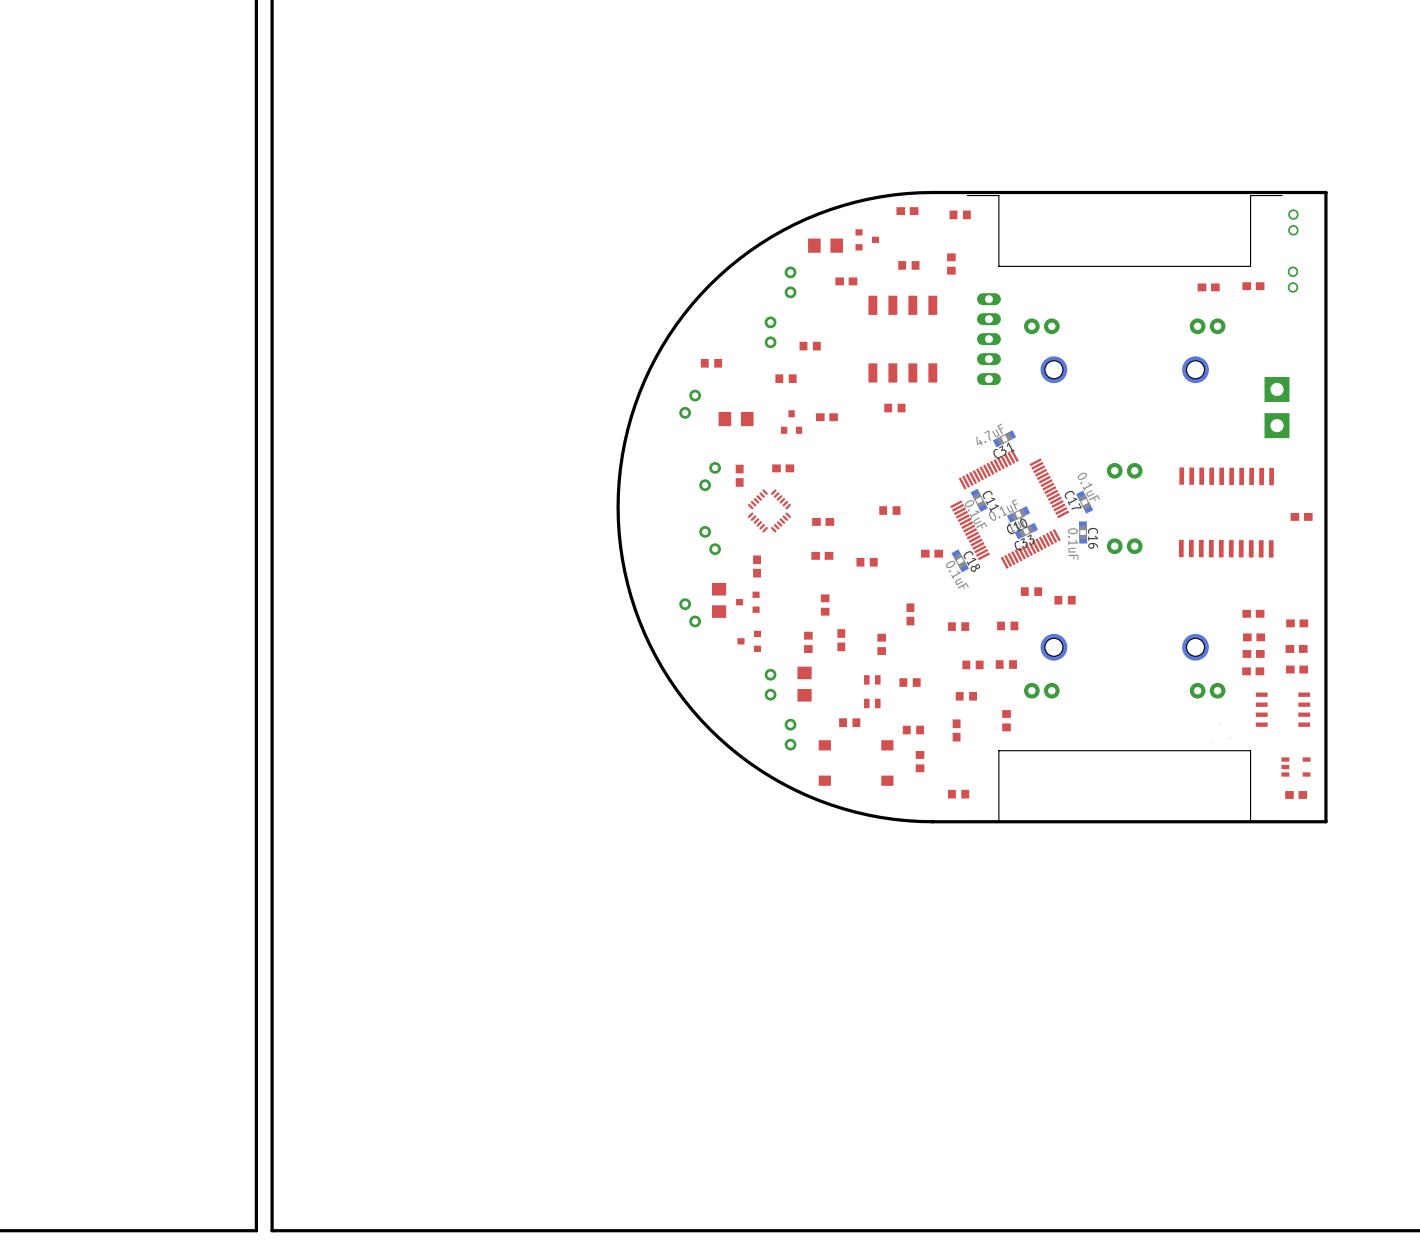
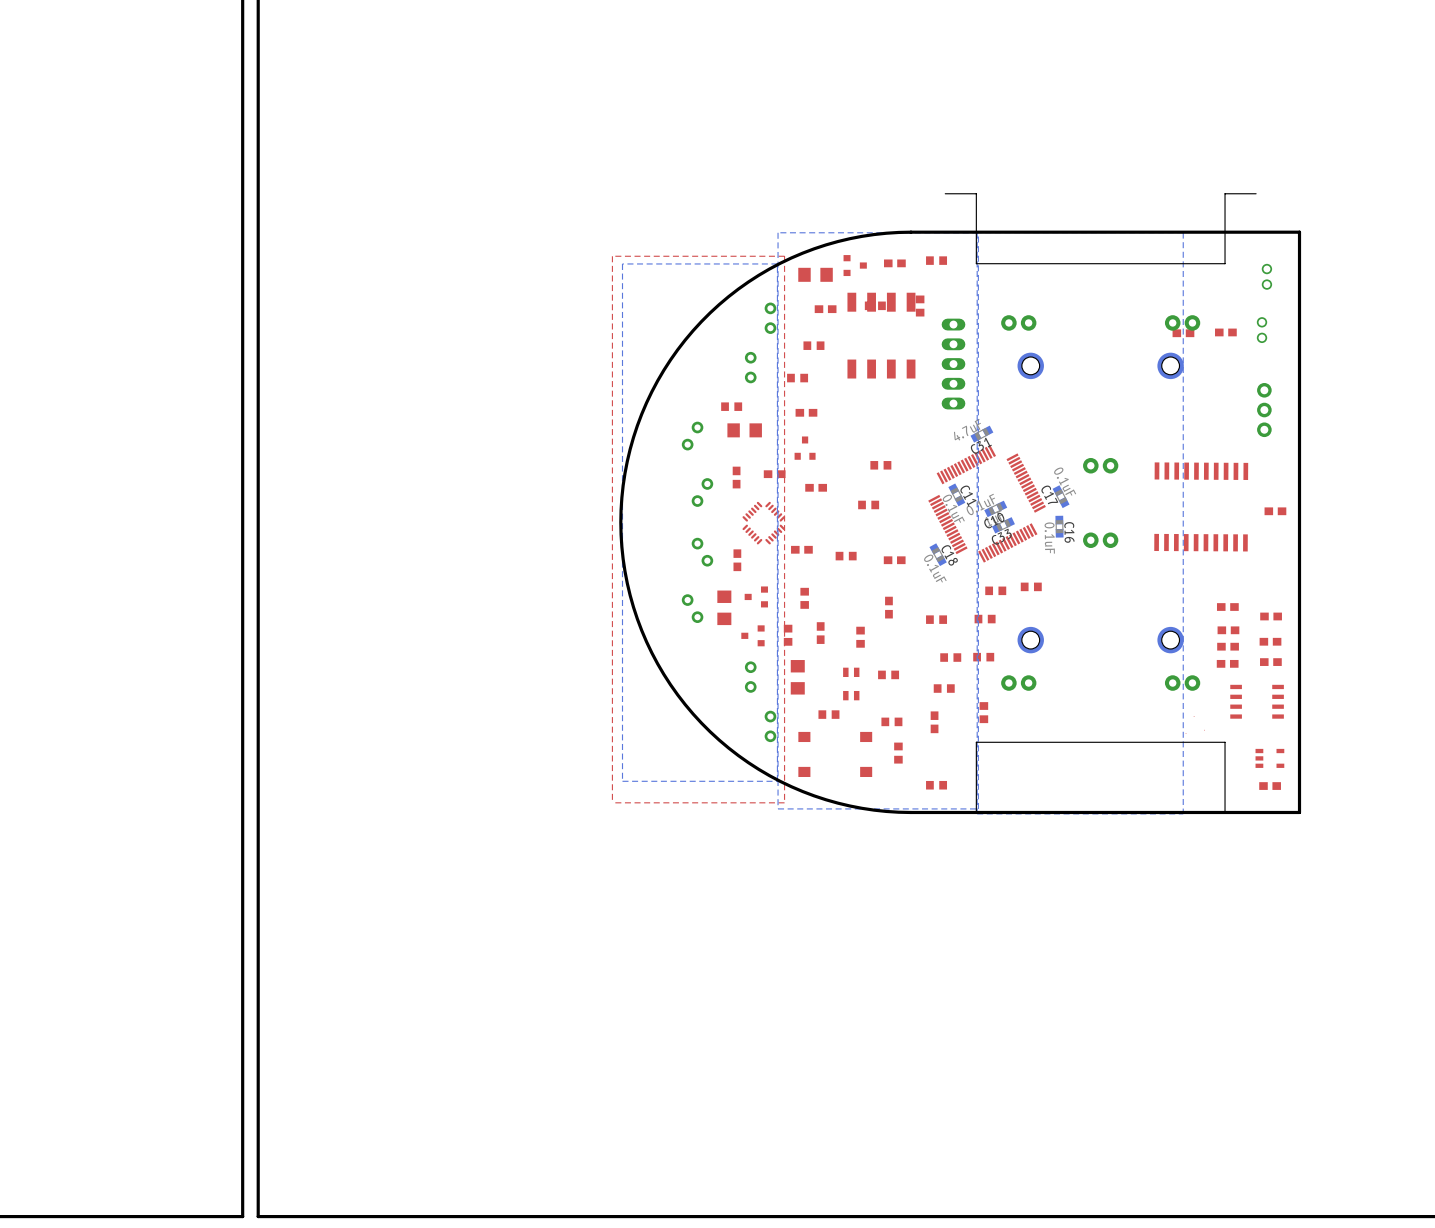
part: (907, 211) -> none
part: (960, 214) -> none
part position: (1293, 222) -> (1262, 330)
bottom zone outline: none -> (1183, 232) (977, 232) (977, 813) (1183, 813) (1183, 232)
board edge: (1325, 234) (1325, 192) (932, 192) (880, 196) (855, 202) (818, 214) (794, 224) (760, 243) (739, 258) (710, 284) (684, 313) (669, 335) (650, 368) (631, 417) (622, 455) (618, 494) (619, 533) (627, 584) (639, 621) (656, 656) (684, 700) (710, 729) (739, 755) (771, 777) (818, 800) (855, 812) (893, 819) (932, 821) -> (1299, 232) (910, 232) (874, 234) (849, 238) (802, 253) (780, 263) (748, 281) (728, 296) (701, 321) (670, 359) (651, 391) (637, 425) (627, 461) (621, 510) (621, 546) (627, 583) (637, 619) (651, 652) (670, 684) (693, 714) (728, 748) (758, 769) (791, 786) (826, 799) (874, 810) (910, 812)
bottom zone outline: none -> (978, 232) (778, 232) (778, 808) (978, 808) (978, 232)
part position: (867, 239) -> (855, 265)
part position: (825, 245) -> (815, 274)
top zone outline: none -> (784, 256) (612, 256) (612, 802) (784, 802) (784, 256)
part footprint: [898, 261, 920, 270] -> [884, 259, 906, 268]
part rotation: 0° (951, 264) -> 90° clockwise (936, 260)
bottom zone outline: none -> (777, 263) (622, 263) (622, 781) (777, 781) (777, 263)
part position: (846, 281) -> (825, 309)
part: (790, 282) -> none
part: (1253, 286) -> none
part: (1208, 287) -> none
part: none -> (875, 305)
part: none -> (920, 306)
part: none -> (770, 318)
part: (770, 332) -> none
part: none -> (1225, 332)
part: none -> (1183, 333)
part position: (988, 339) -> (953, 364)
part: (810, 346) -> none
part: none -> (813, 345)
part: (711, 363) -> none
part: none -> (750, 367)
part: (785, 378) -> none
part: none -> (797, 378)
part: (690, 404) -> none
part: (1277, 407) -> none
part: (894, 408) -> none
part: none -> (731, 406)
part: none -> (1264, 410)
part position: (736, 419) -> (744, 430)
part position: (791, 422) -> (805, 448)
part: none -> (692, 436)
part: (783, 468) -> none
part: none -> (880, 465)
part: (739, 475) -> none
part: (710, 476) -> none
part: none -> (774, 474)
part: none -> (736, 477)
part: none -> (816, 487)
part: none -> (702, 492)
part position: (769, 510) -> (763, 523)
part: (823, 521) -> none
part position: (710, 540) -> (702, 552)
part position: (932, 553) -> (894, 560)
part: (1031, 591) -> none
part: none -> (1031, 586)
part: none -> (995, 590)
part position: (719, 600) -> (724, 607)
part: (1065, 600) -> none
part: (747, 602) -> none
part: none -> (756, 596)
part position: (690, 612) -> (692, 608)
part: (749, 641) -> none
part: none -> (752, 635)
part position: (804, 684) -> (797, 677)

